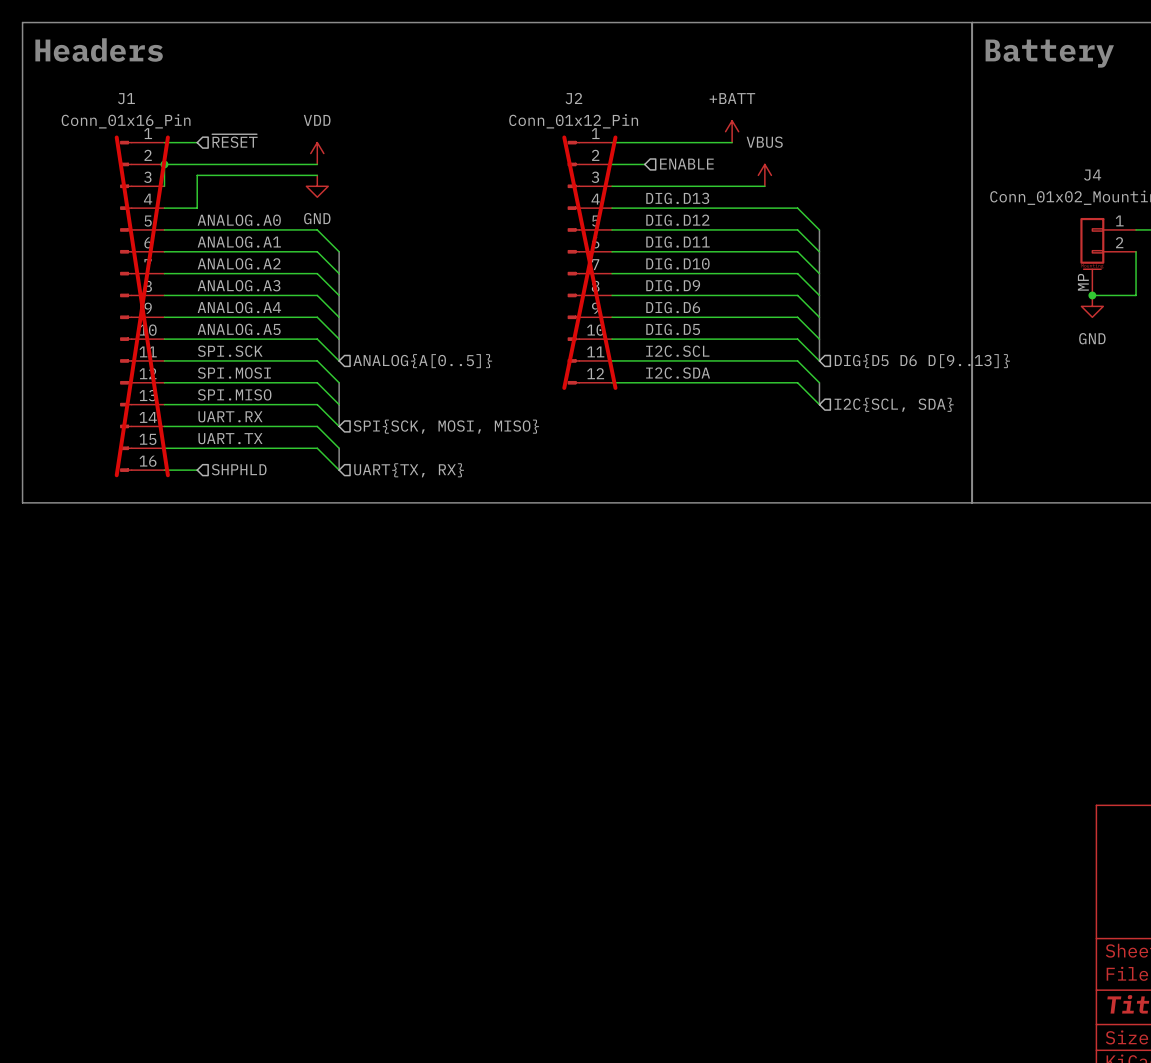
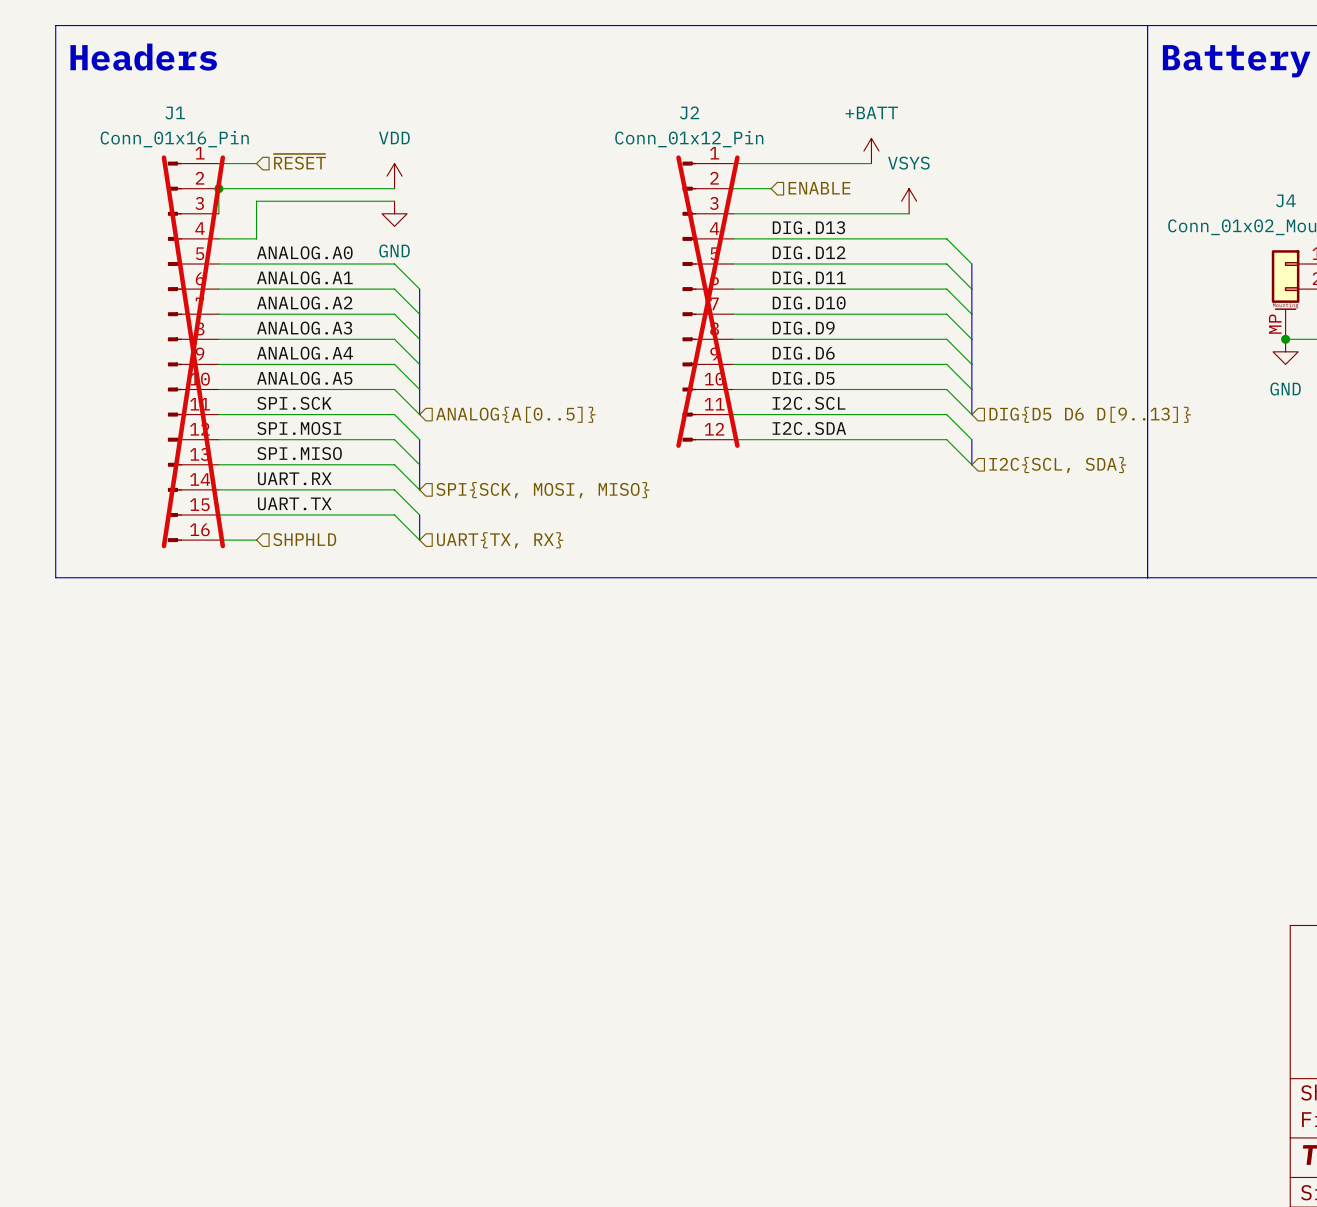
power symbol: VBUS (764, 175) -> VSYS (909, 201)

